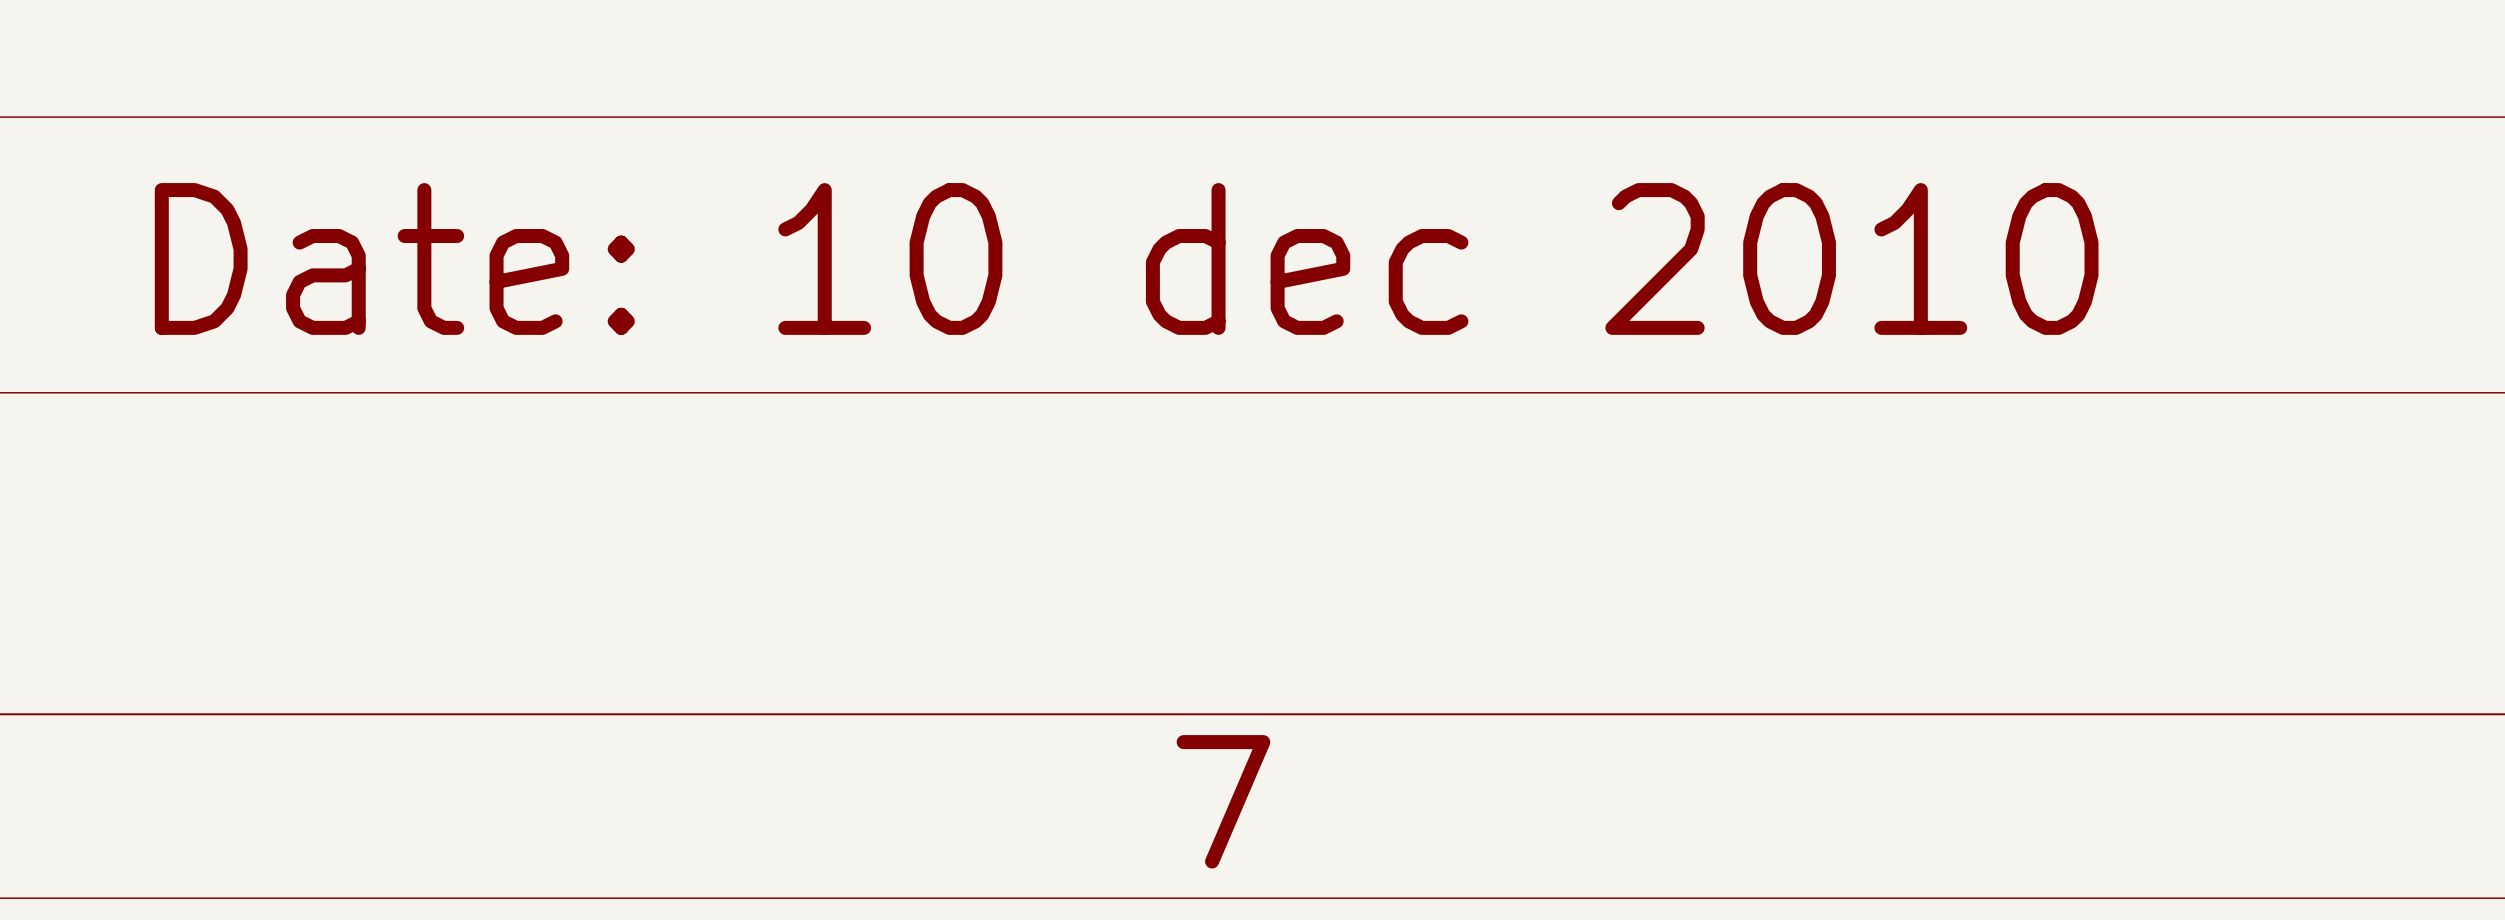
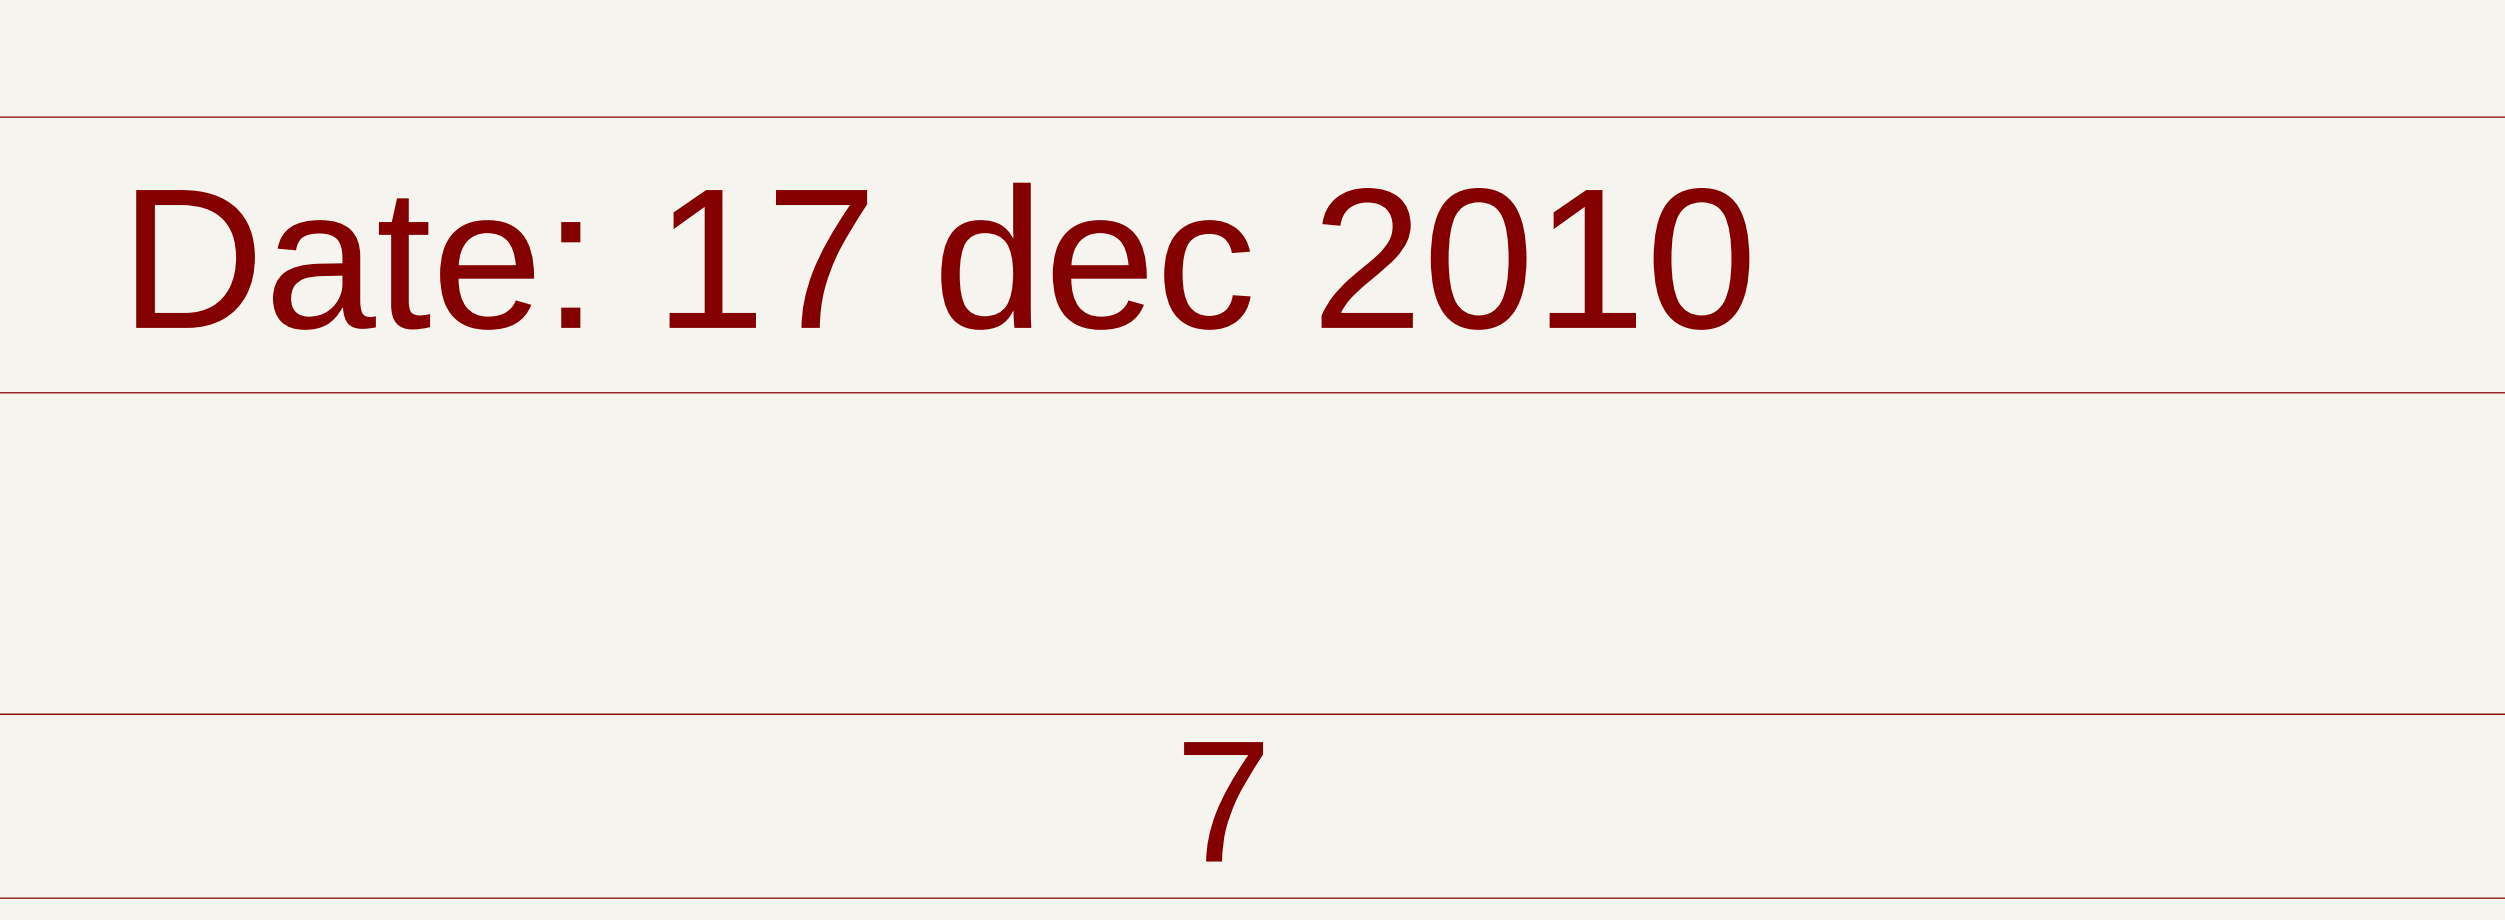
title block: Date: 10 dec 2010 (1126, 258) -> Date: 17 dec 2010 (942, 256)

